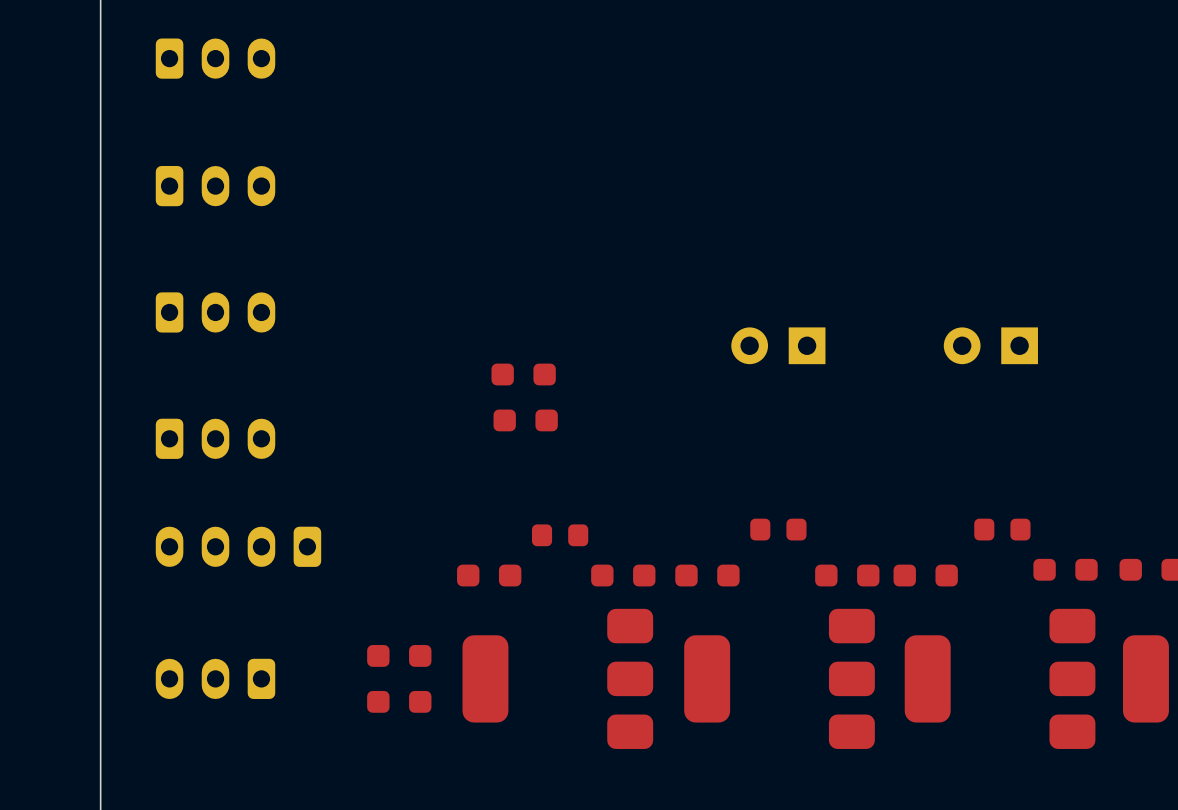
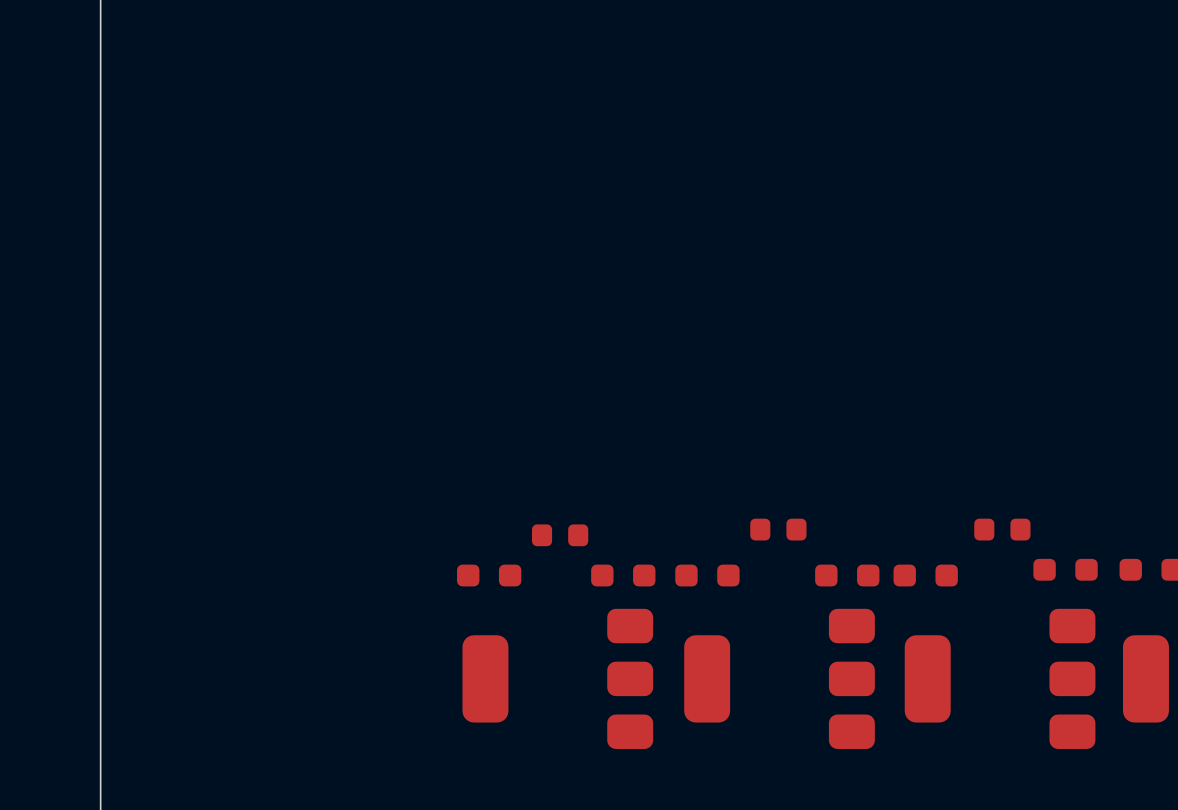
part: (215, 58) -> none
part: (215, 186) -> none
part: (215, 312) -> none
part: (778, 345) -> none
part: (990, 345) -> none
part: (523, 374) -> none
part: (525, 420) -> none
part: (215, 438) -> none
part: (238, 546) -> none
part: (399, 655) -> none
part: (215, 678) -> none
part: (399, 701) -> none

